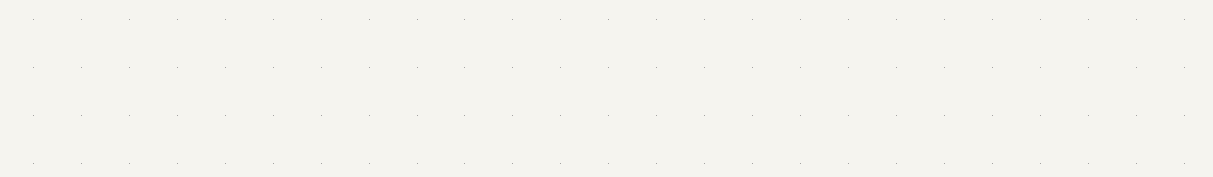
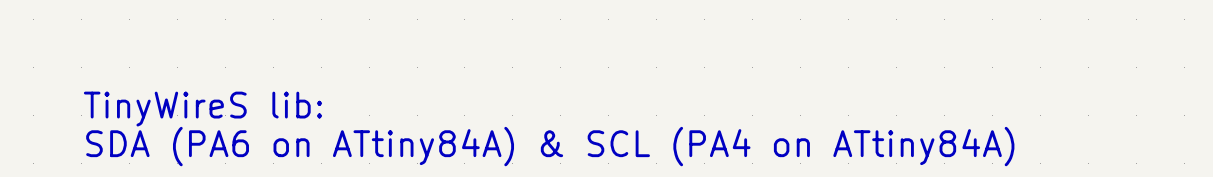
text: none -> TinyWireS lib: (202, 109)
text: none -> SDA (PA6 on ATtiny84A) & SCL (PA4 on ATtiny84A) (550, 146)

